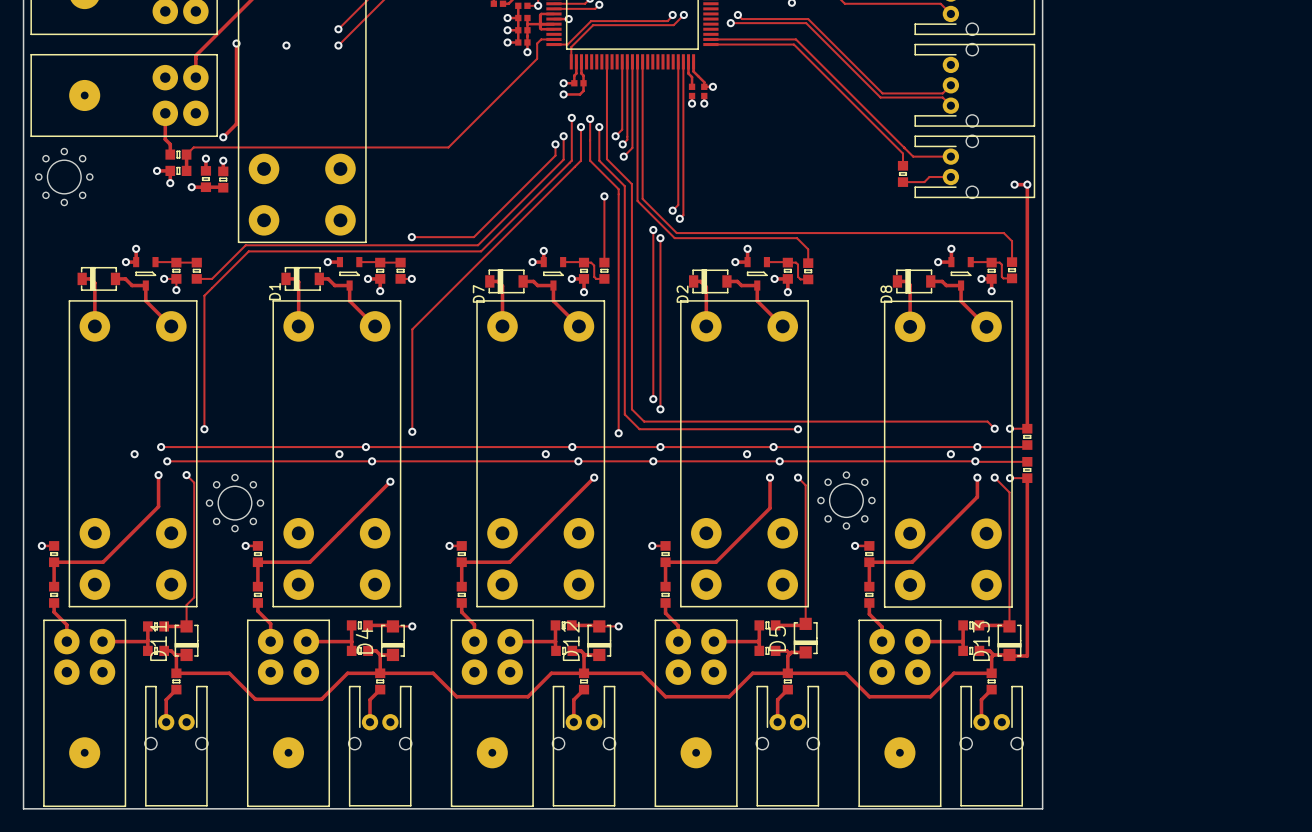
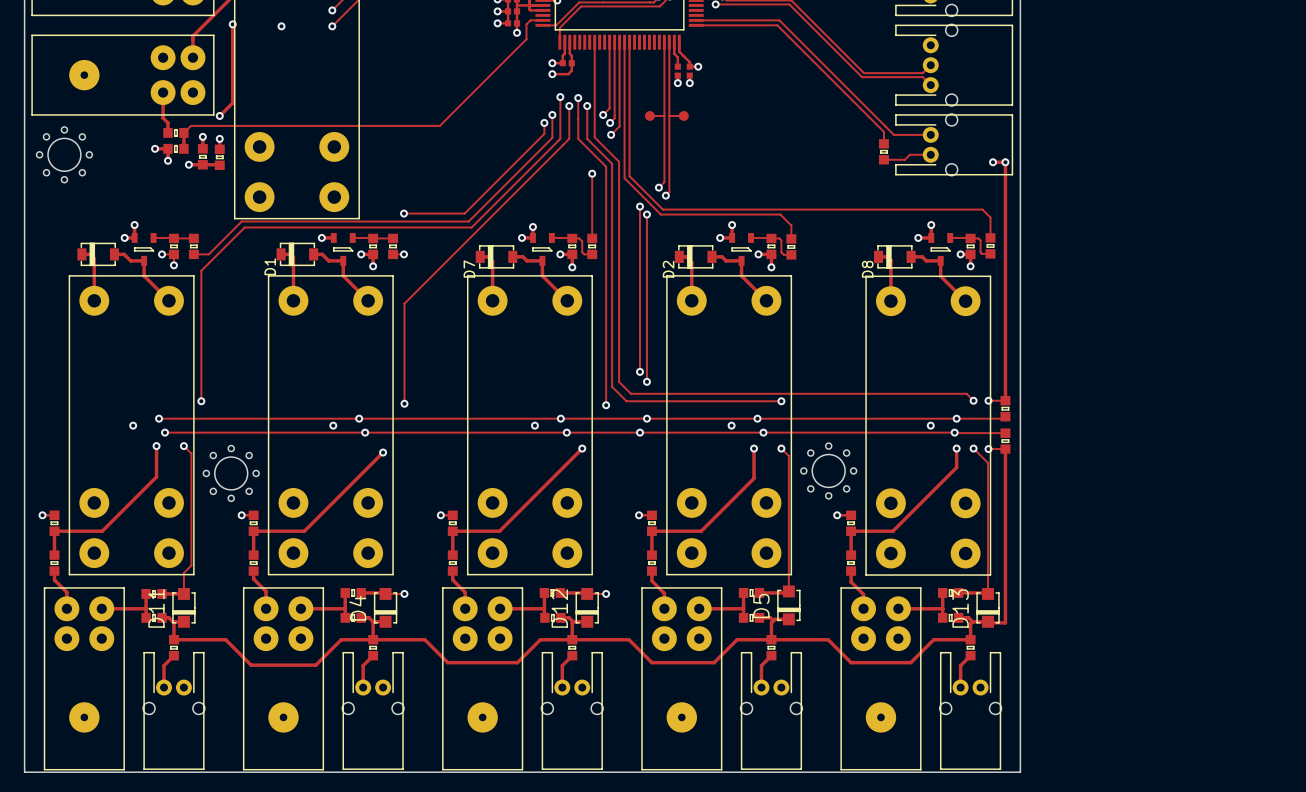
track: none -> (649, 115) (664, 115)
part: none -> (649, 115)
track: none -> (669, 115) (683, 115)
part: none -> (683, 115)

